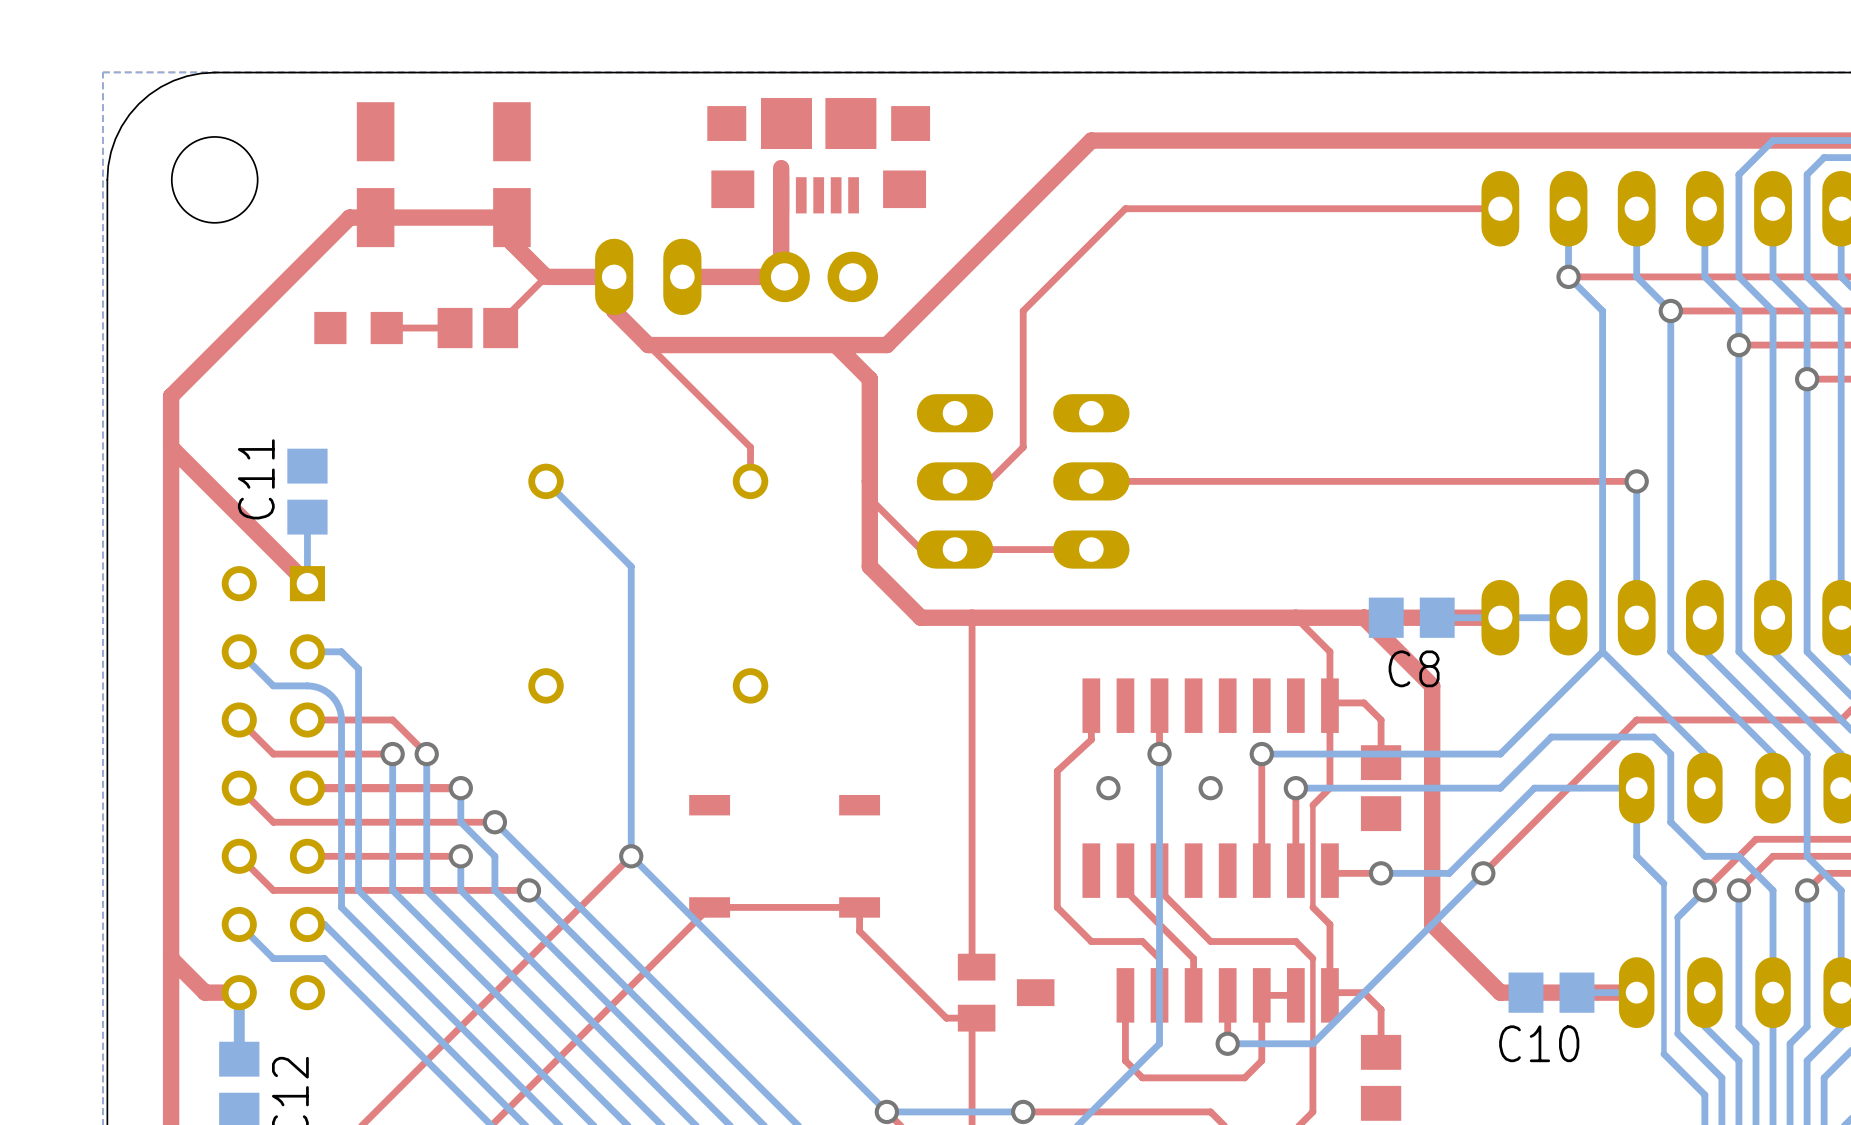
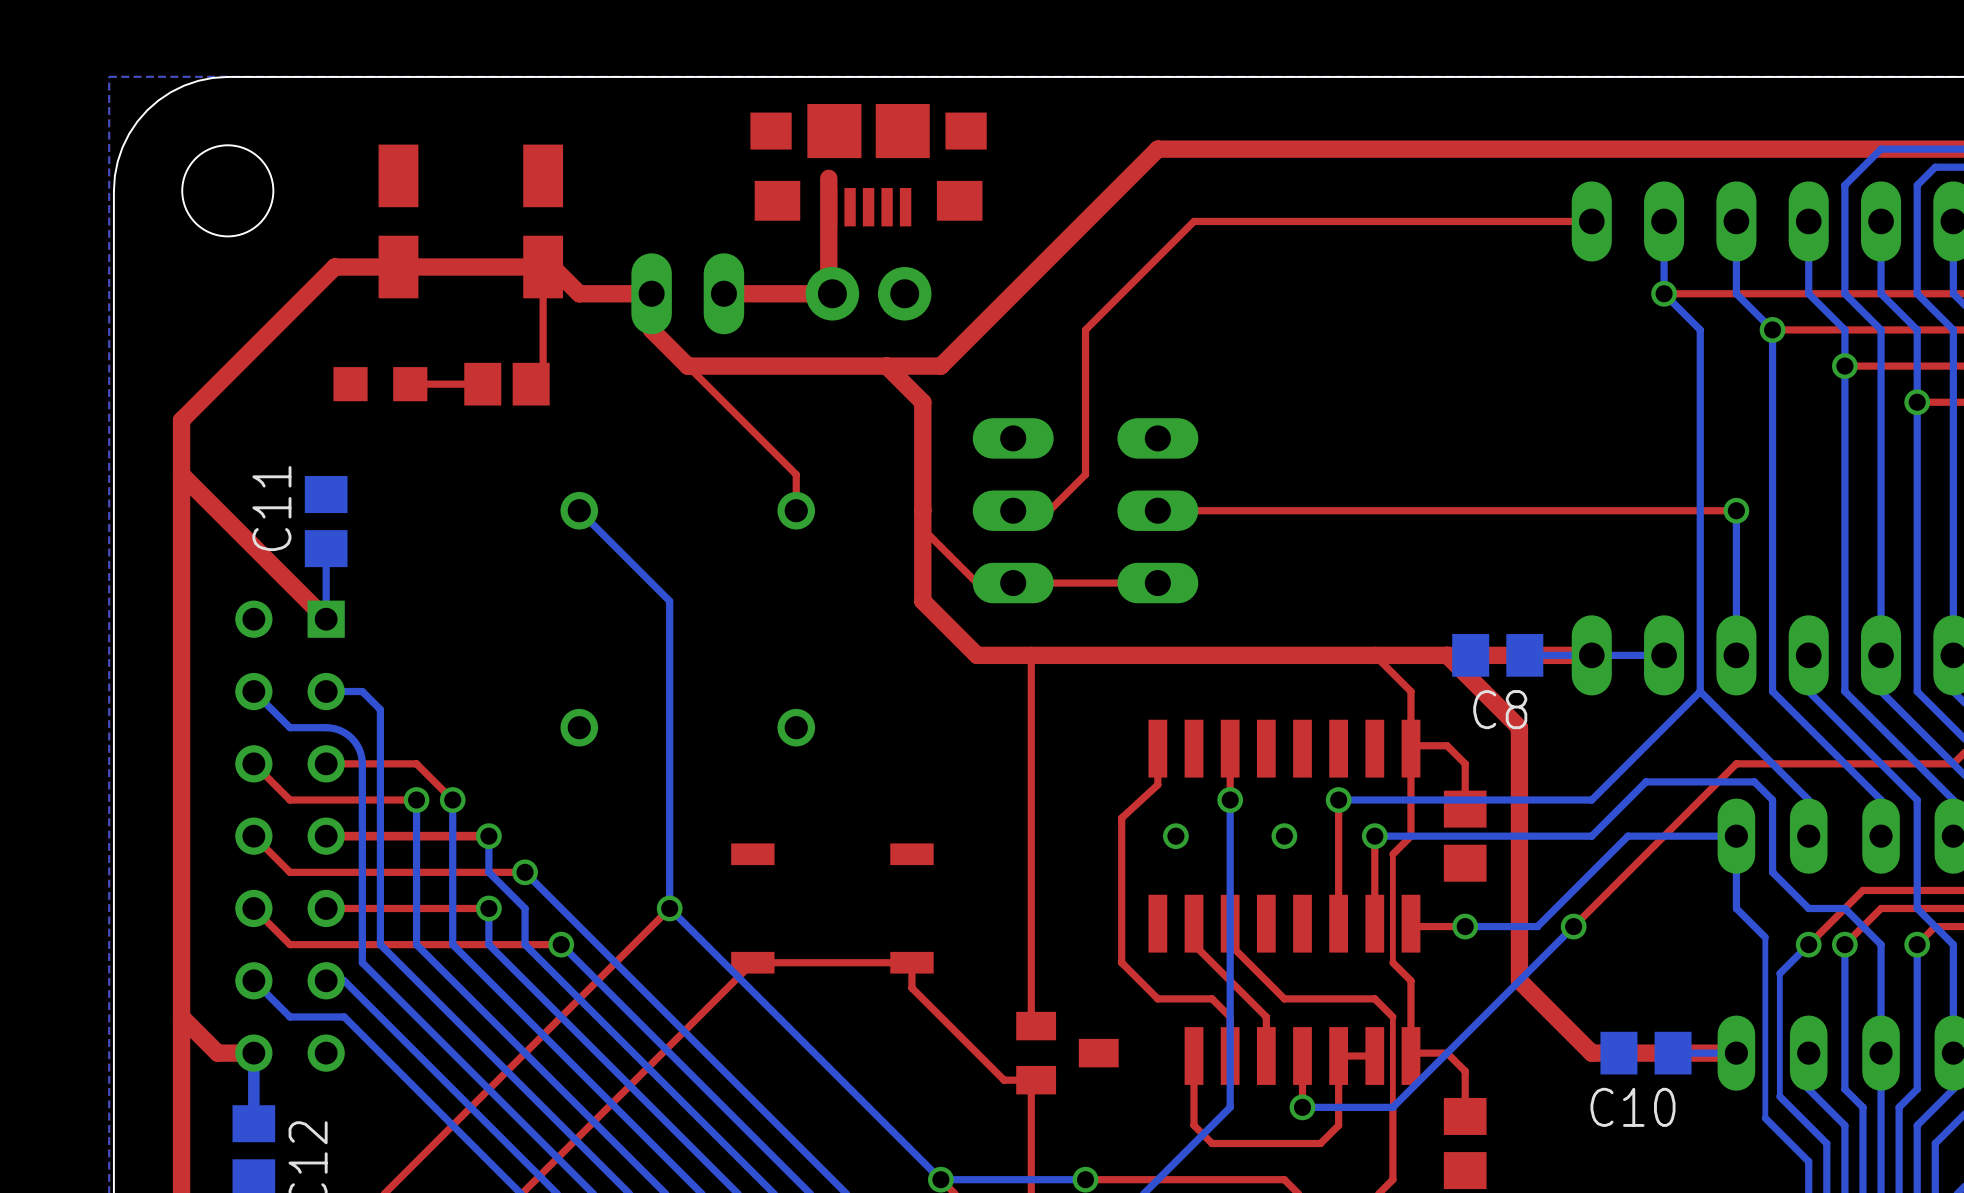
part position: (375, 174) -> (398, 221)
part position: (511, 174) -> (543, 221)
top track: none -> (543, 267) (543, 372) (531, 384)
top track: (520, 251) (511, 242) (511, 217) (349, 217) (315, 251) -> (552, 267) (334, 267)
top track: (546, 276) (500, 322) (500, 328) -> none
part position: (358, 328) -> (380, 384)
top track: (455, 328) (386, 328) -> (482, 384) (410, 384)
part position: (477, 328) -> (506, 384)

